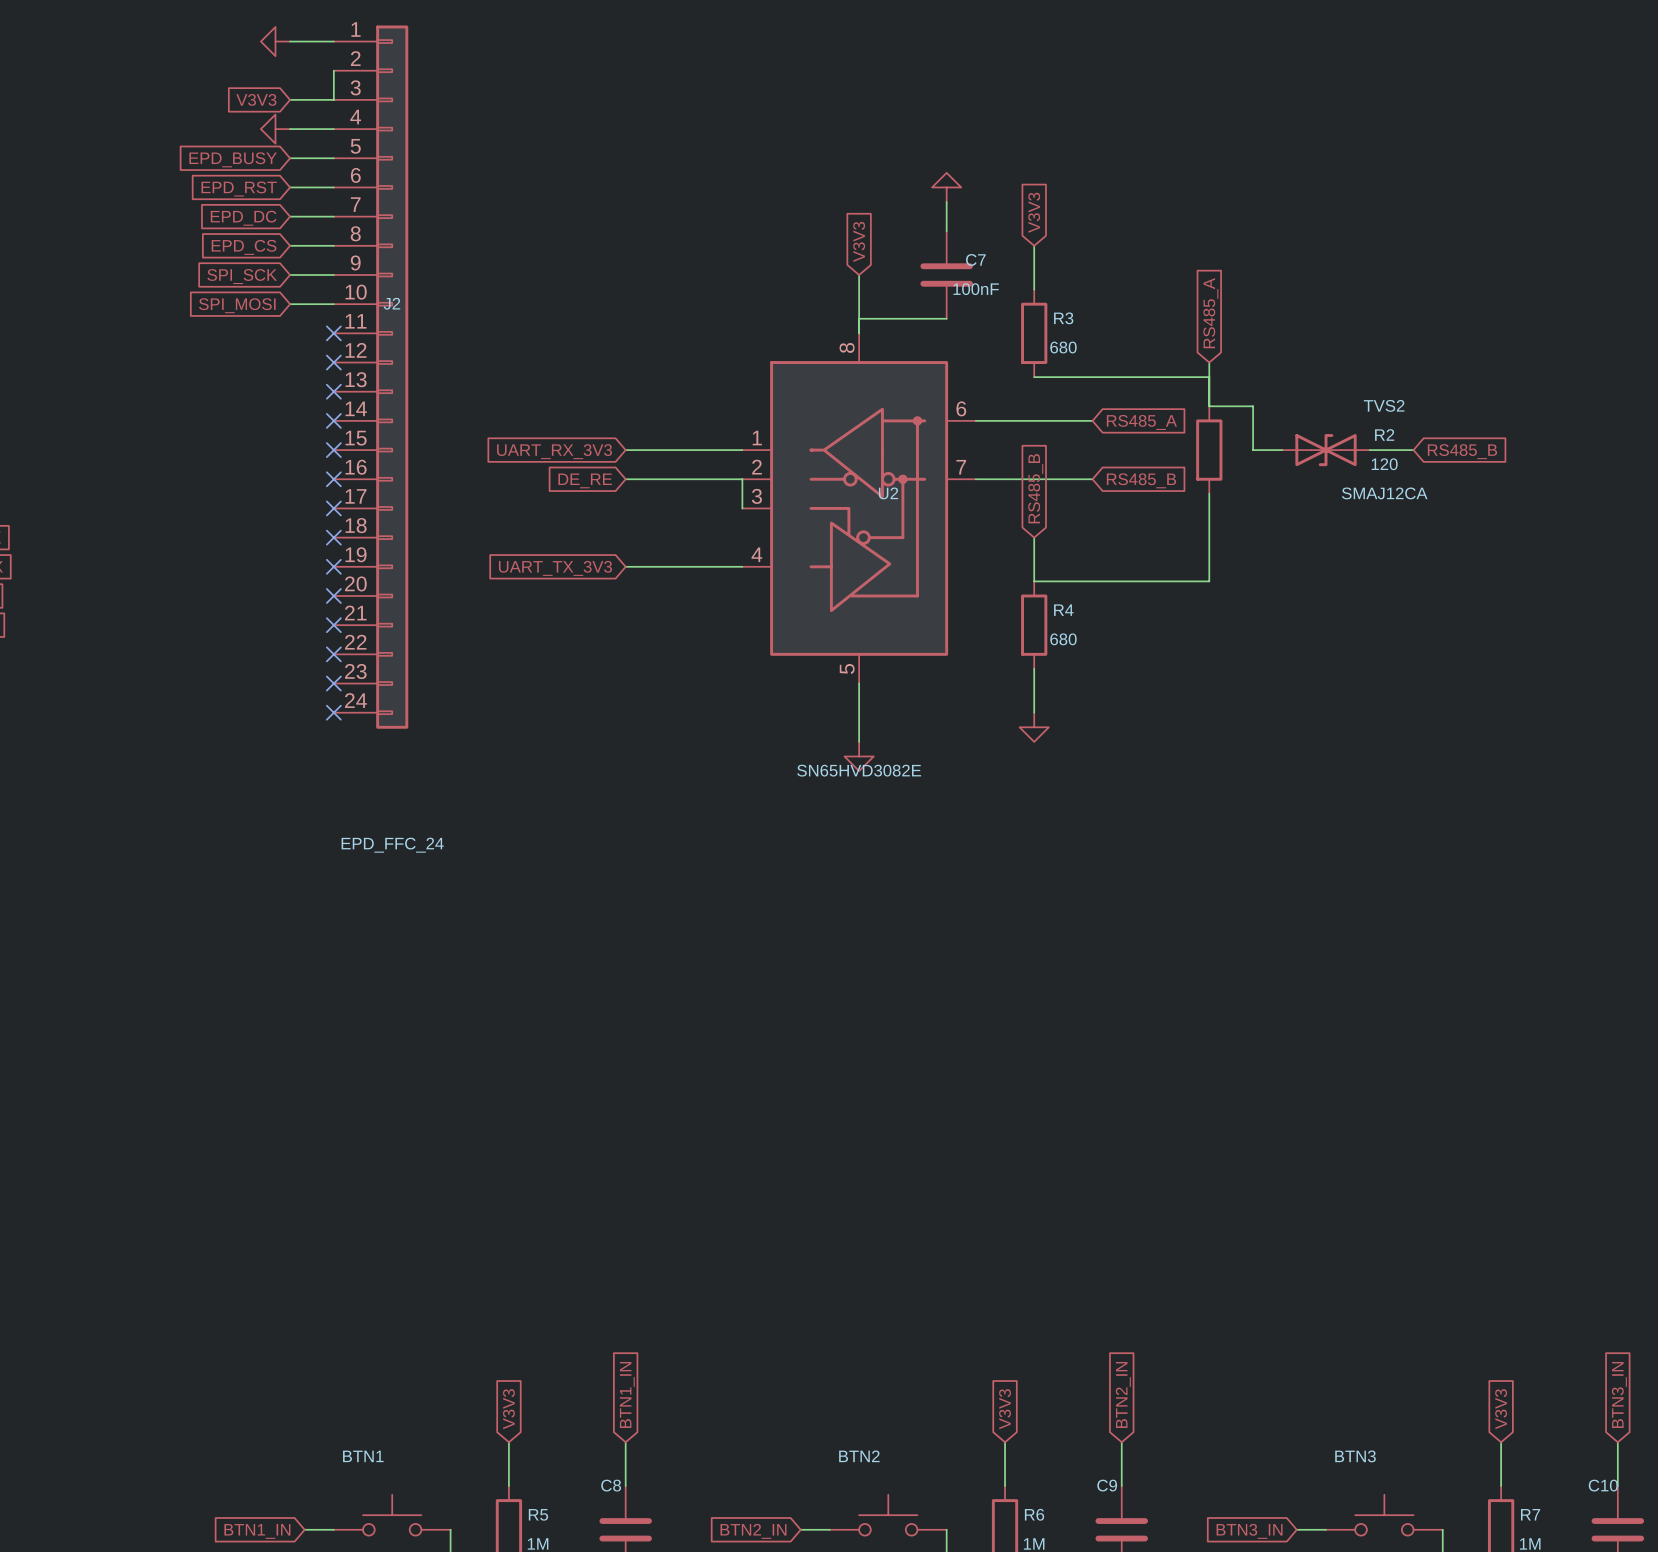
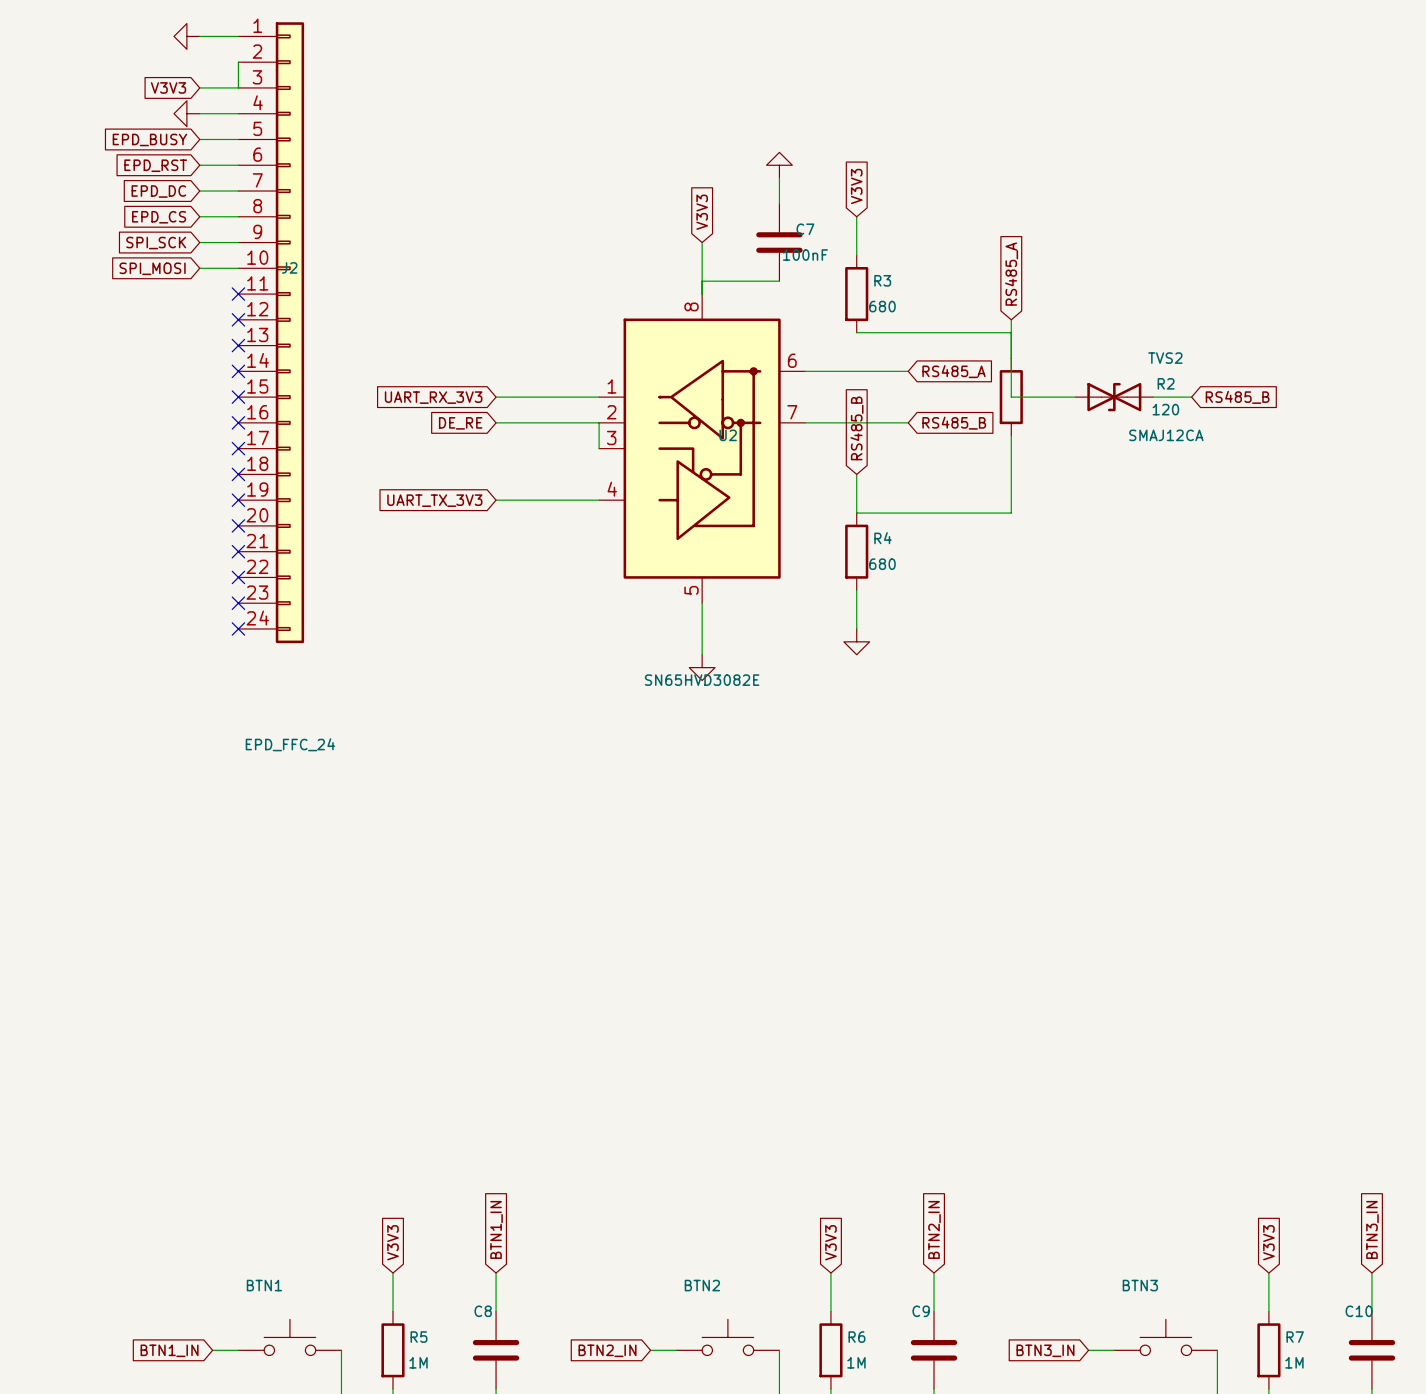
wire: (1209, 406) (1253, 406) (1253, 450) -> (1011, 358) (1011, 397) (1049, 397)

